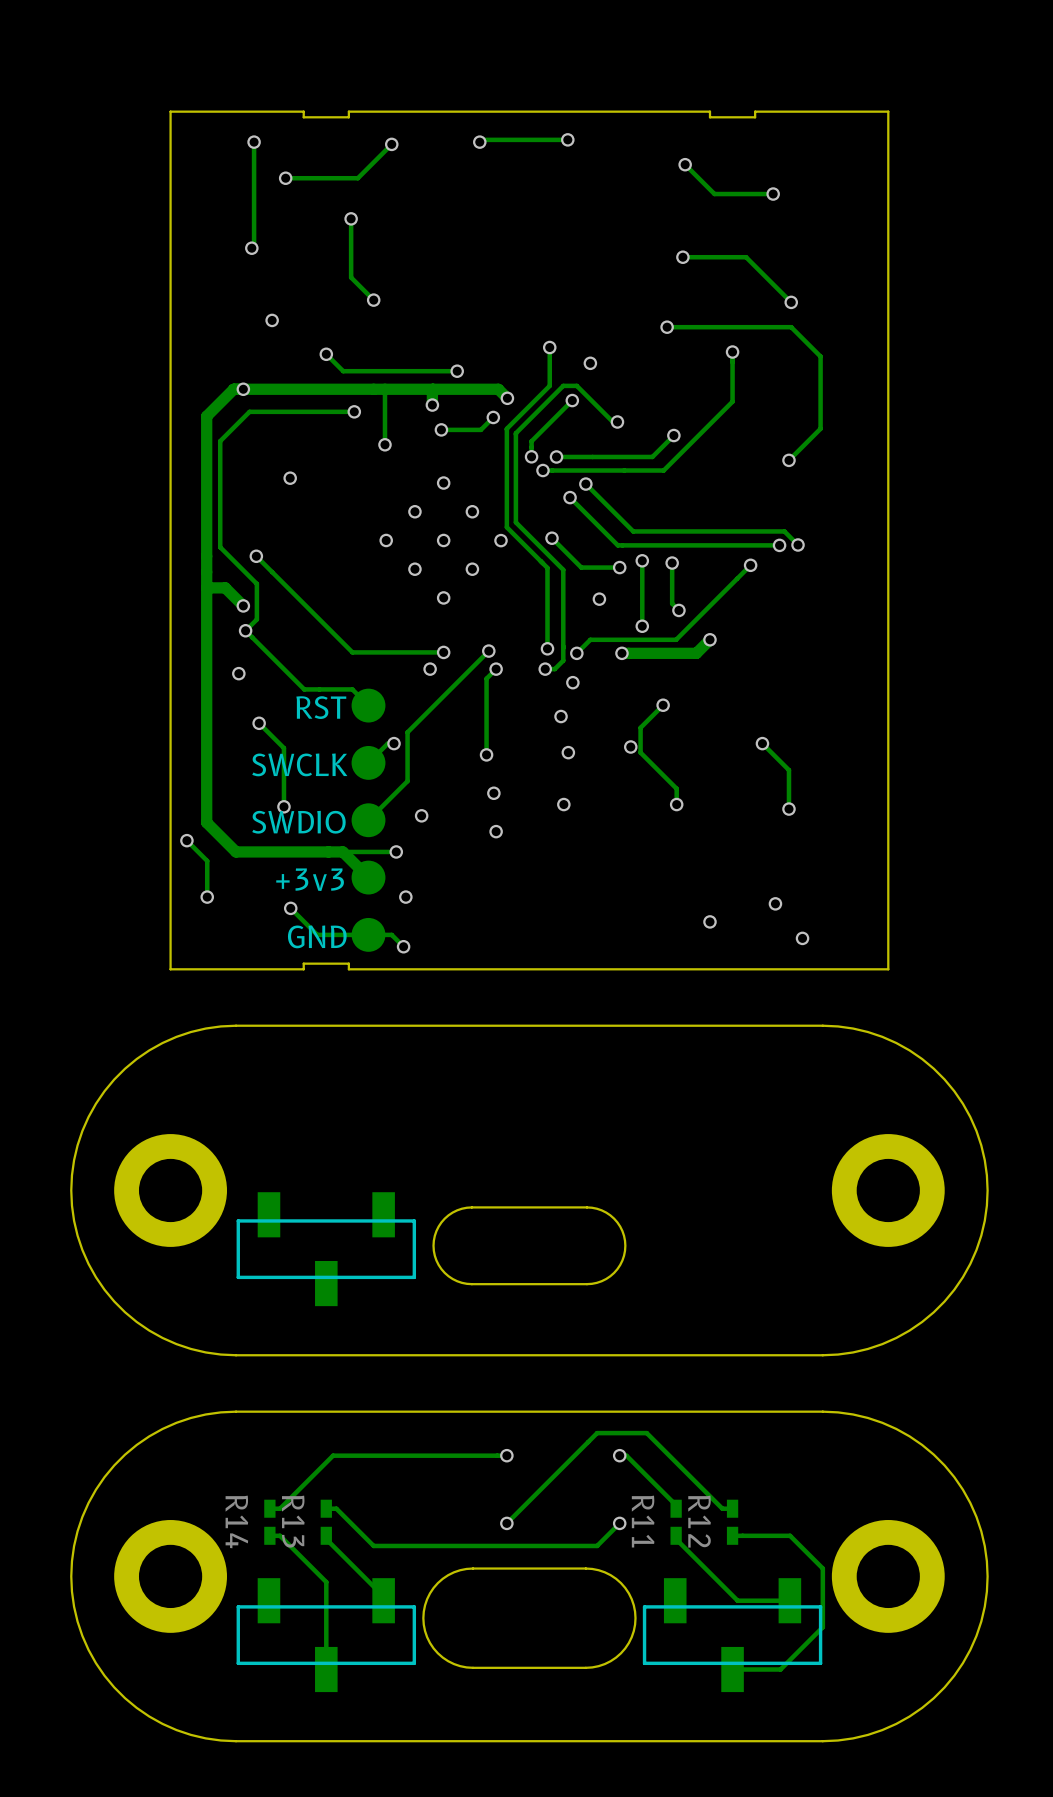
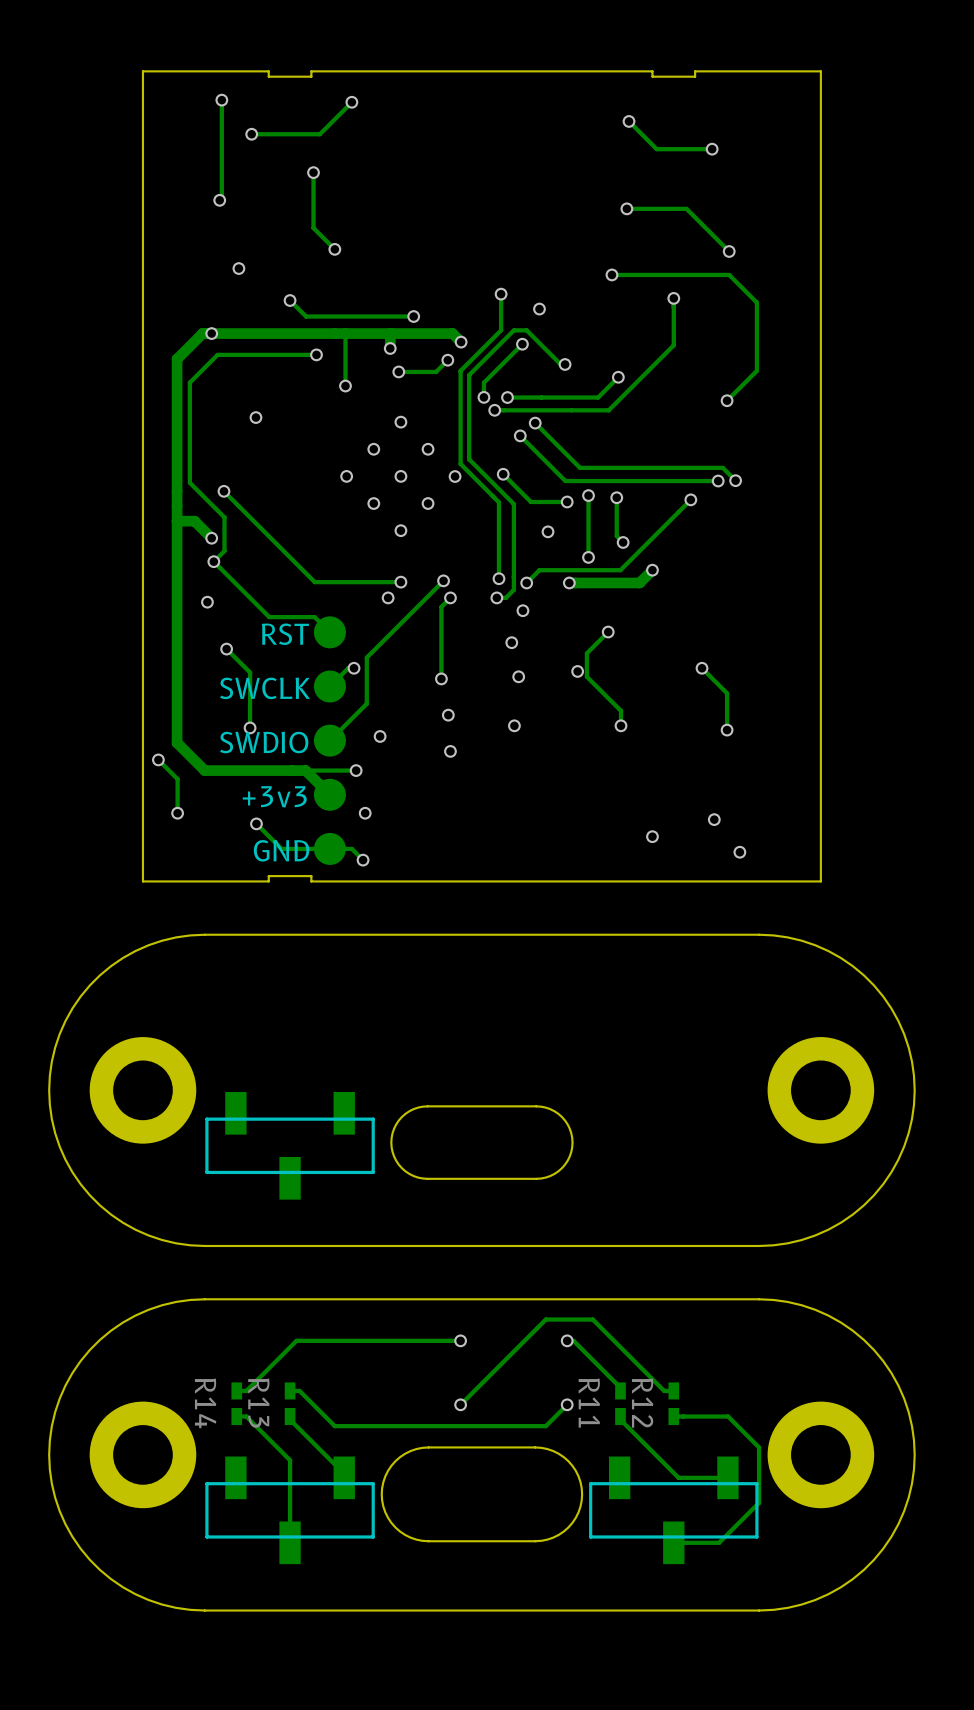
track: (567, 139) (482, 139) (479, 142) -> none
via: (567, 139) -> none
via: (479, 142) -> none

